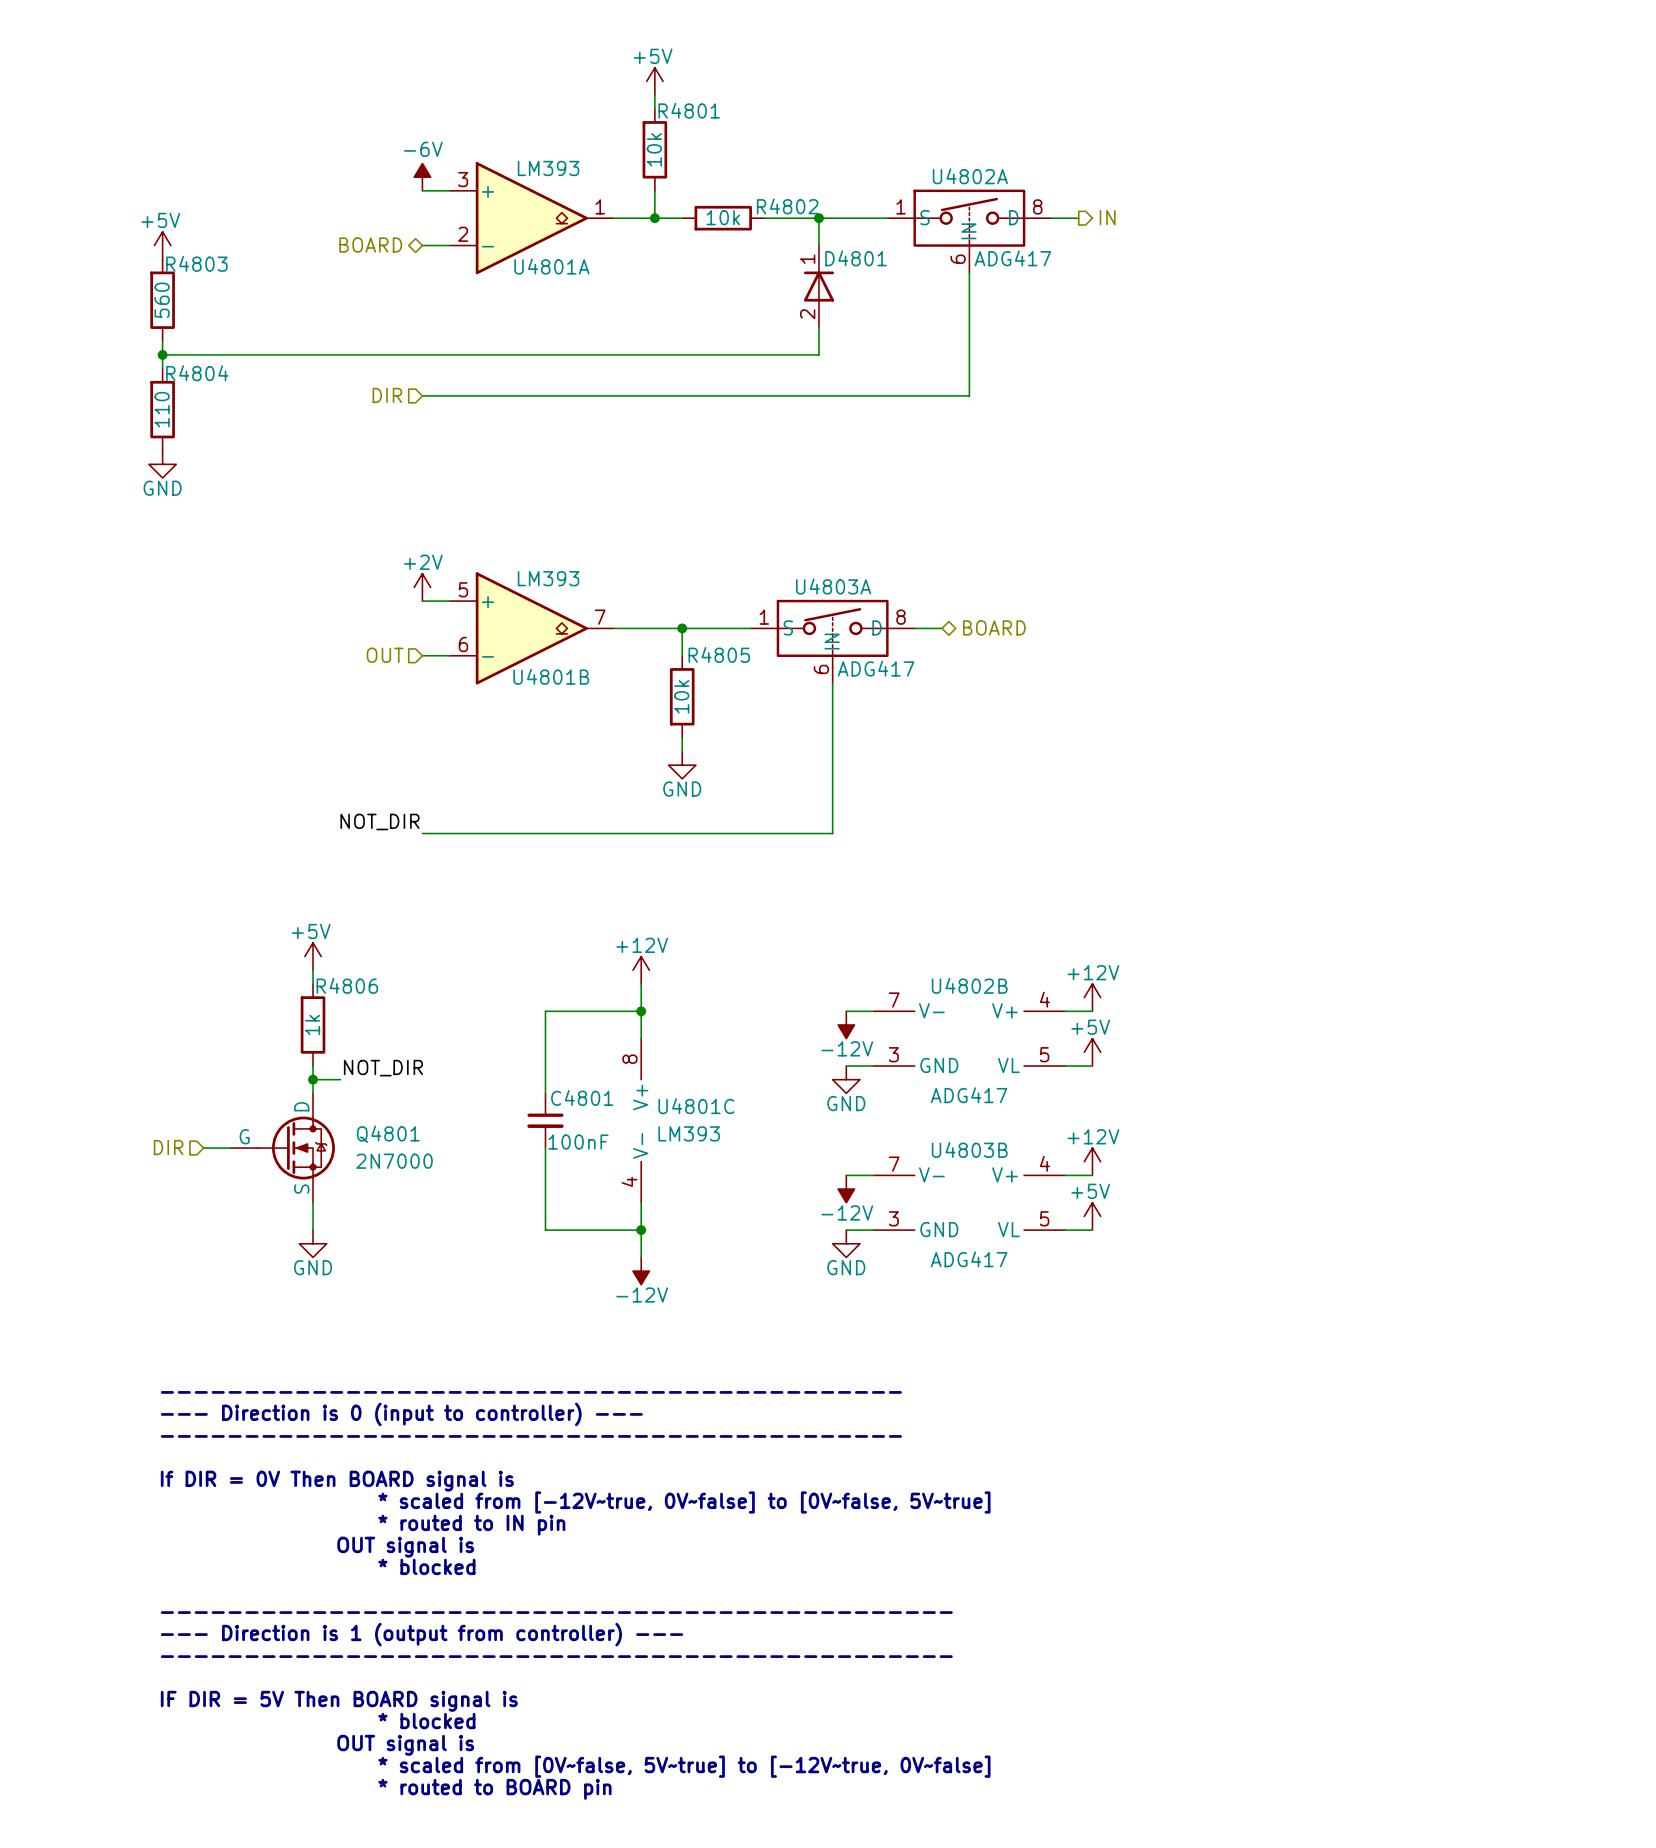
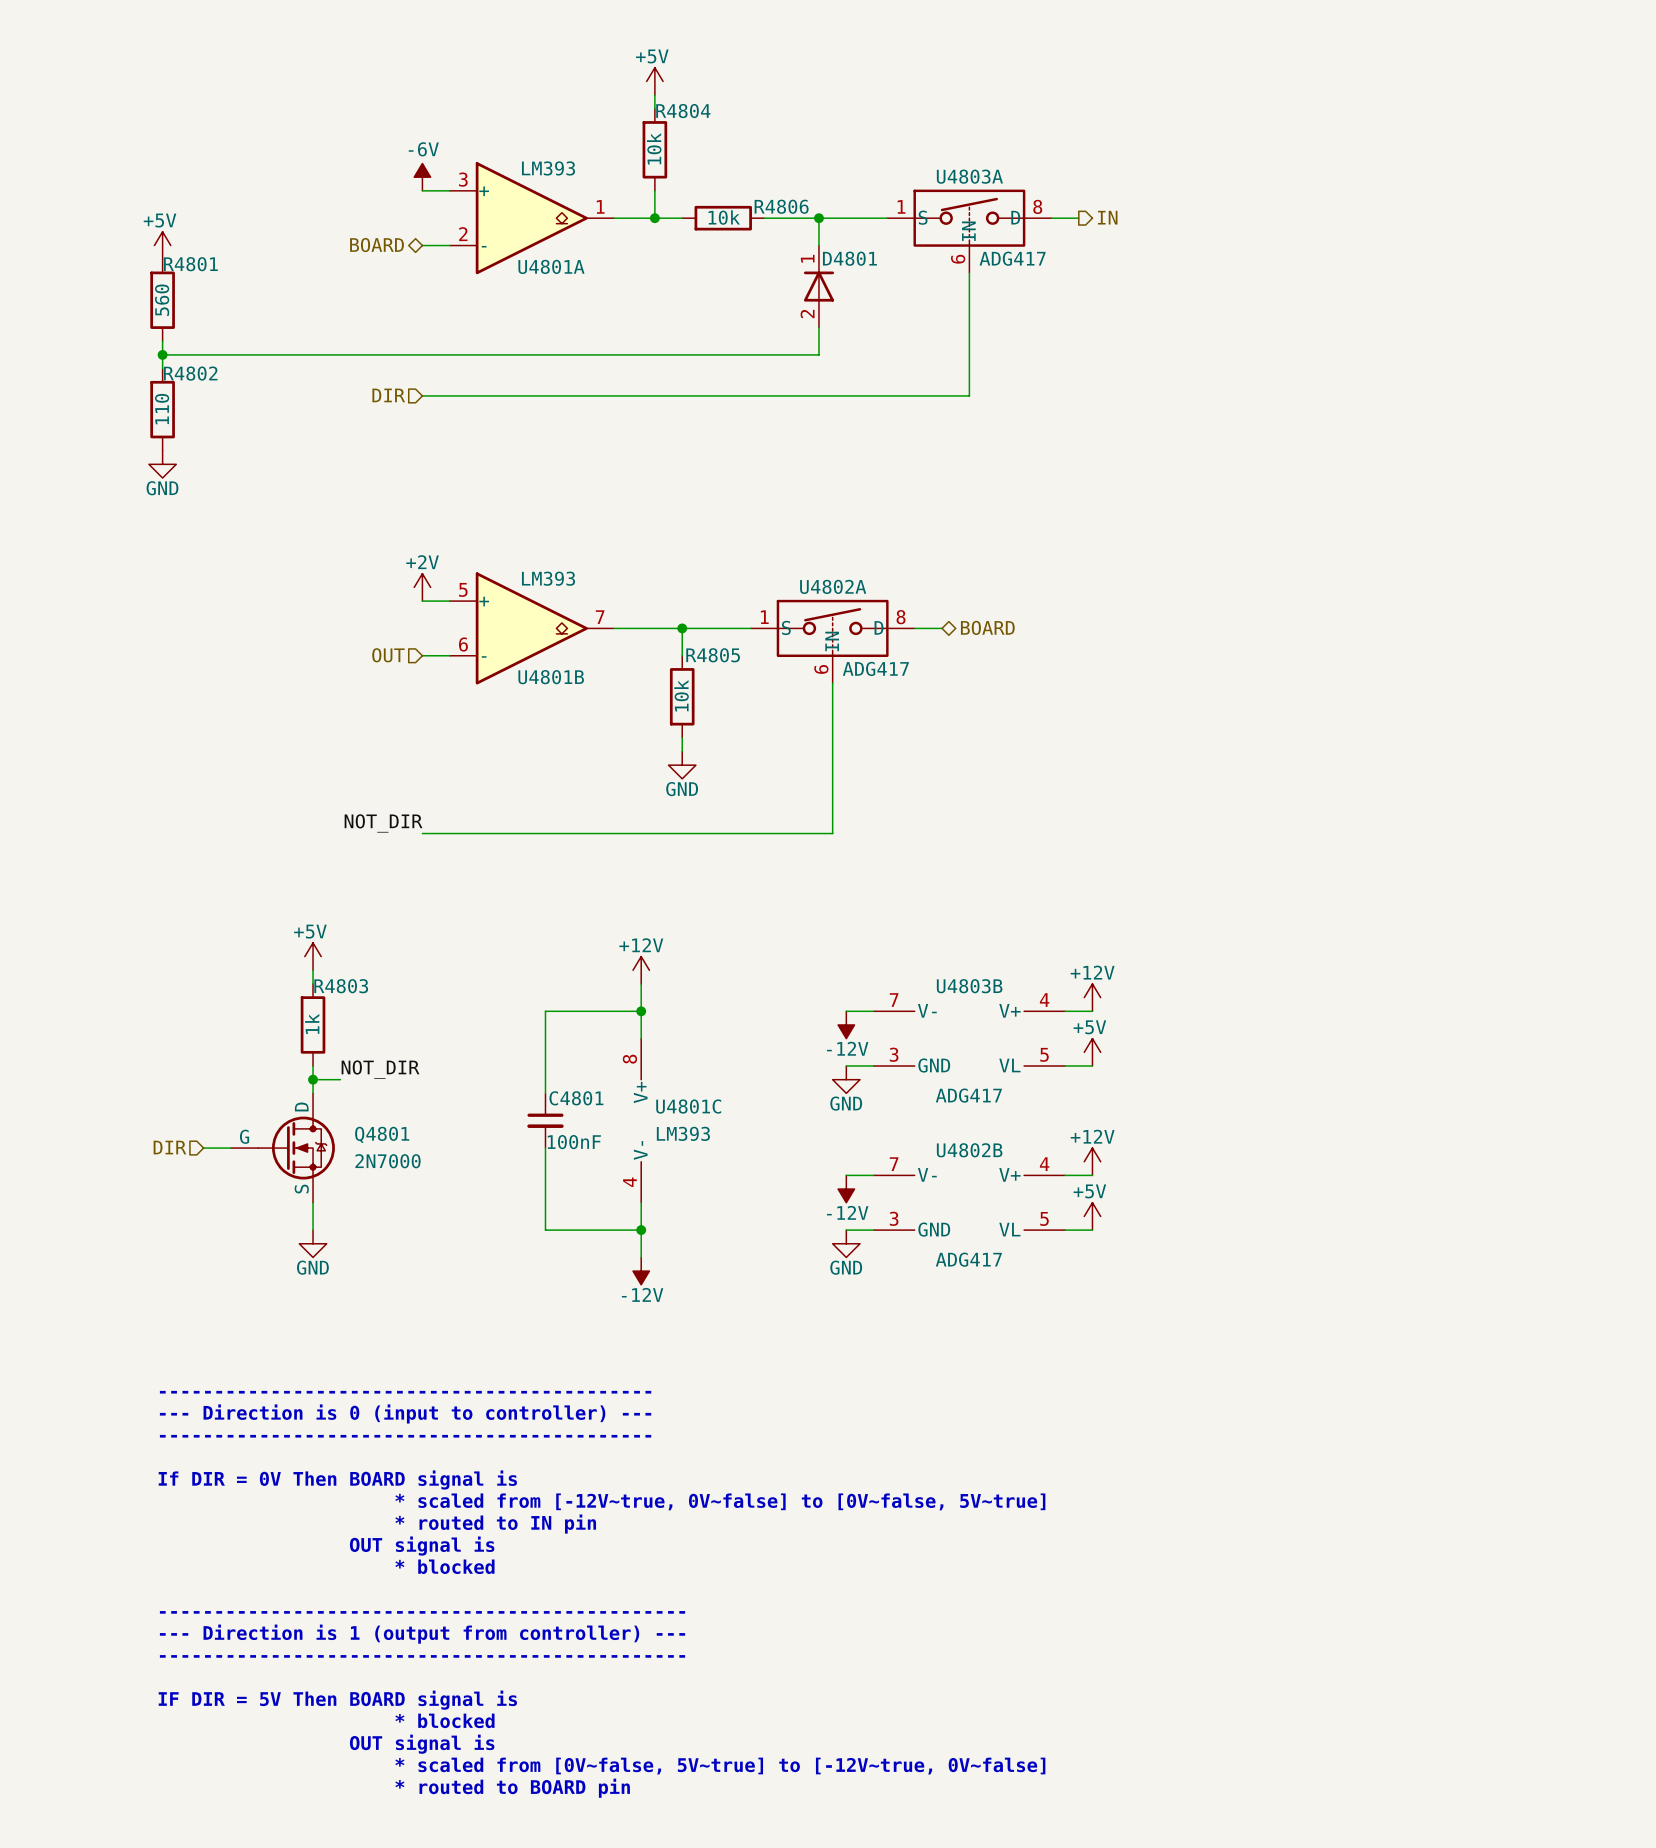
R4801 name: R4801 (689, 110) -> R4804 (683, 111)
U4802A name: U4802A (970, 176) -> U4803A (969, 176)
R4802 name: R4802 (787, 206) -> R4806 (781, 206)
R4803 name: R4803 (196, 263) -> R4801 (190, 264)
R4804 name: R4804 (197, 373) -> R4802 (190, 373)
U4803A name: U4803A (833, 586) -> U4802A (833, 586)
R4806 name: R4806 (347, 985) -> R4803 (341, 986)
U4802B name: U4802B (969, 985) -> U4803B (969, 986)
U4803B name: U4803B (969, 1149) -> U4802B (969, 1150)

